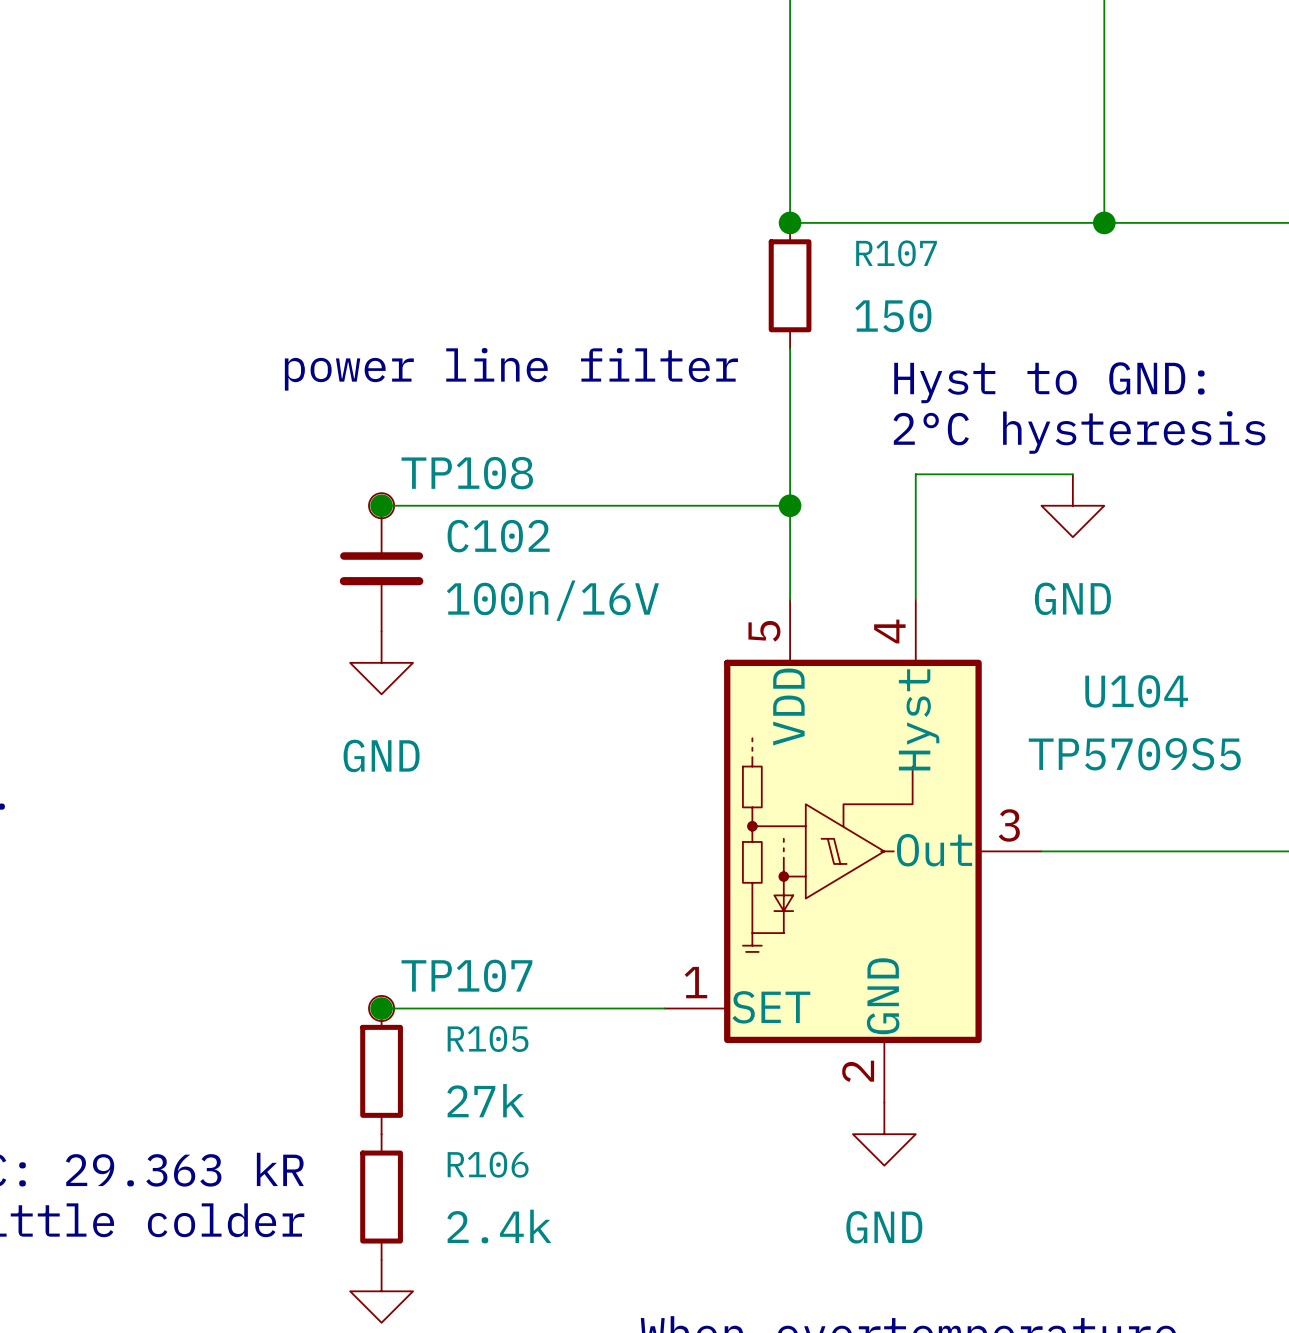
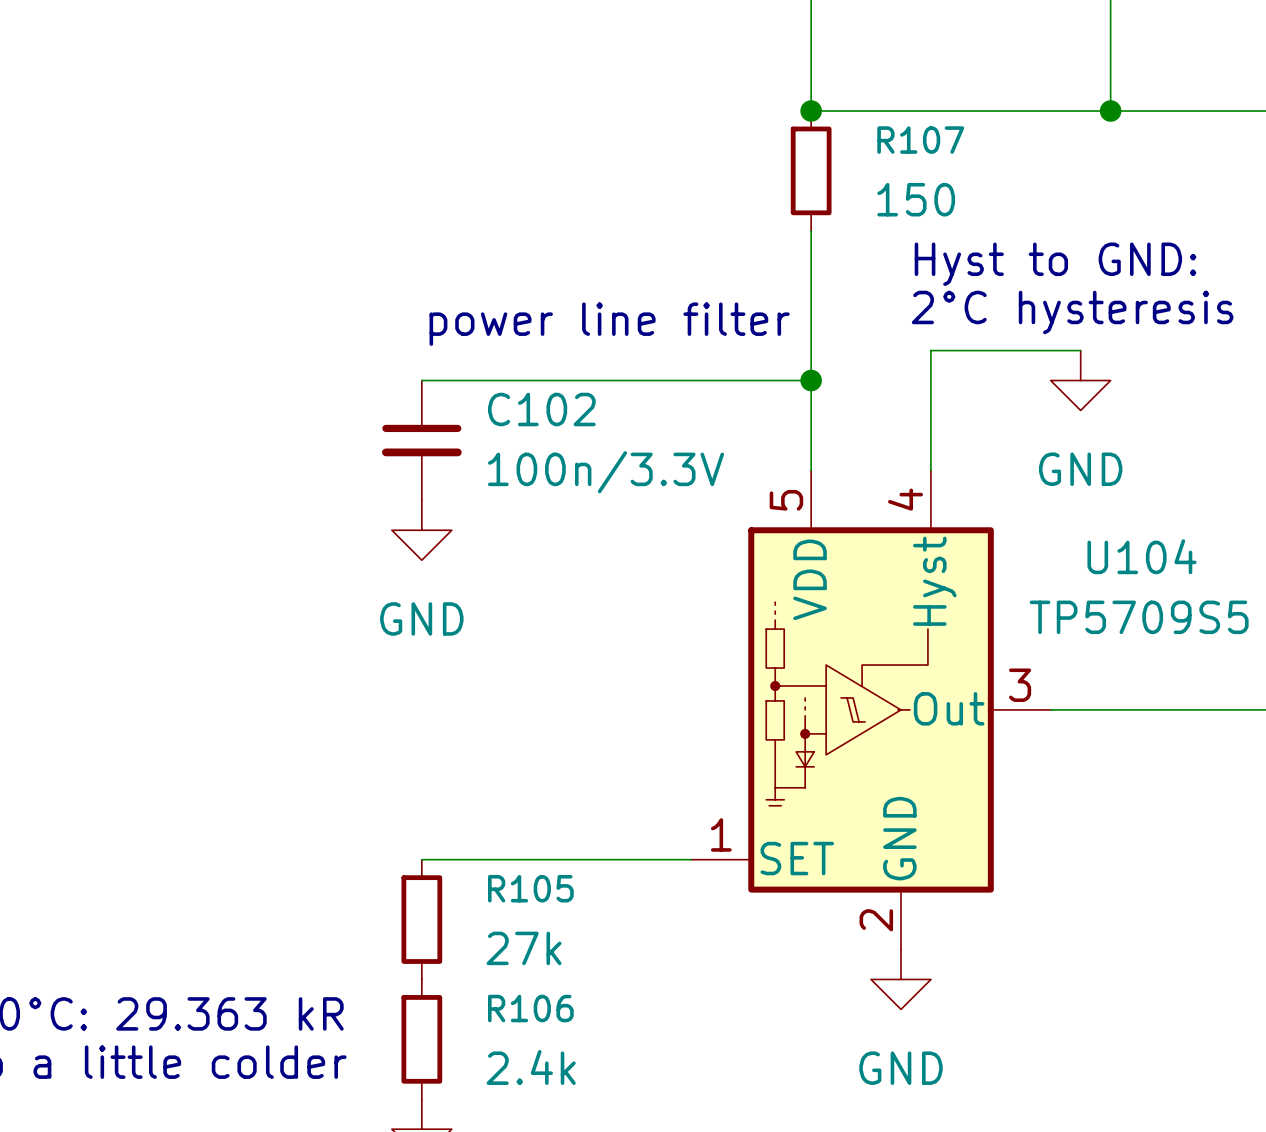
text position: power line filter (511, 369) -> power line filter (609, 324)
junction: (381, 505) -> none
TP108: (381, 505) -> none
C102 value: 100n/16V (552, 600) -> 100n/3.3V (606, 472)
junction: (381, 1008) -> none
TP107: (381, 1008) -> none

